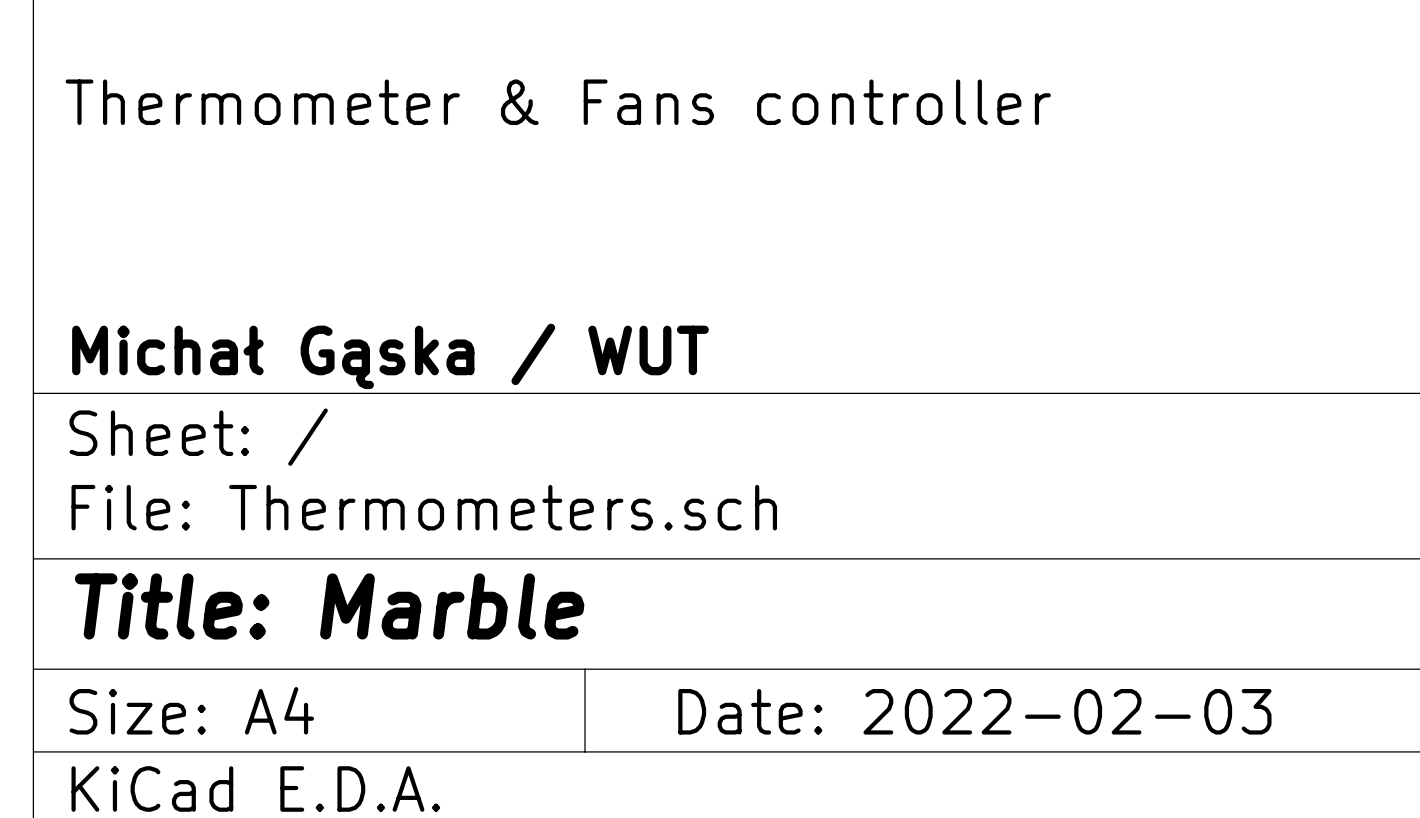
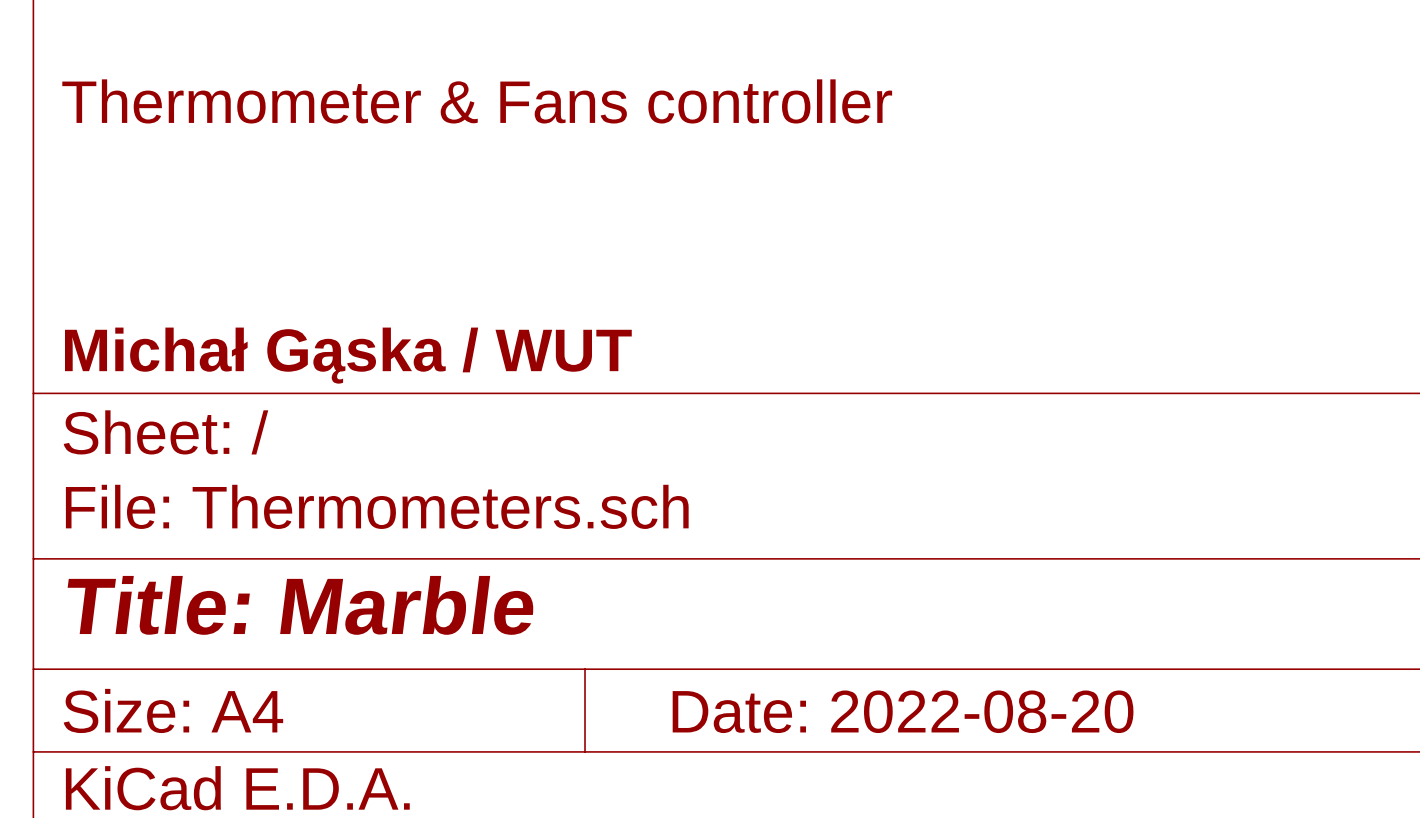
title block: Date: 2022-02-03 (974, 711) -> Date: 2022-08-20 (903, 711)

